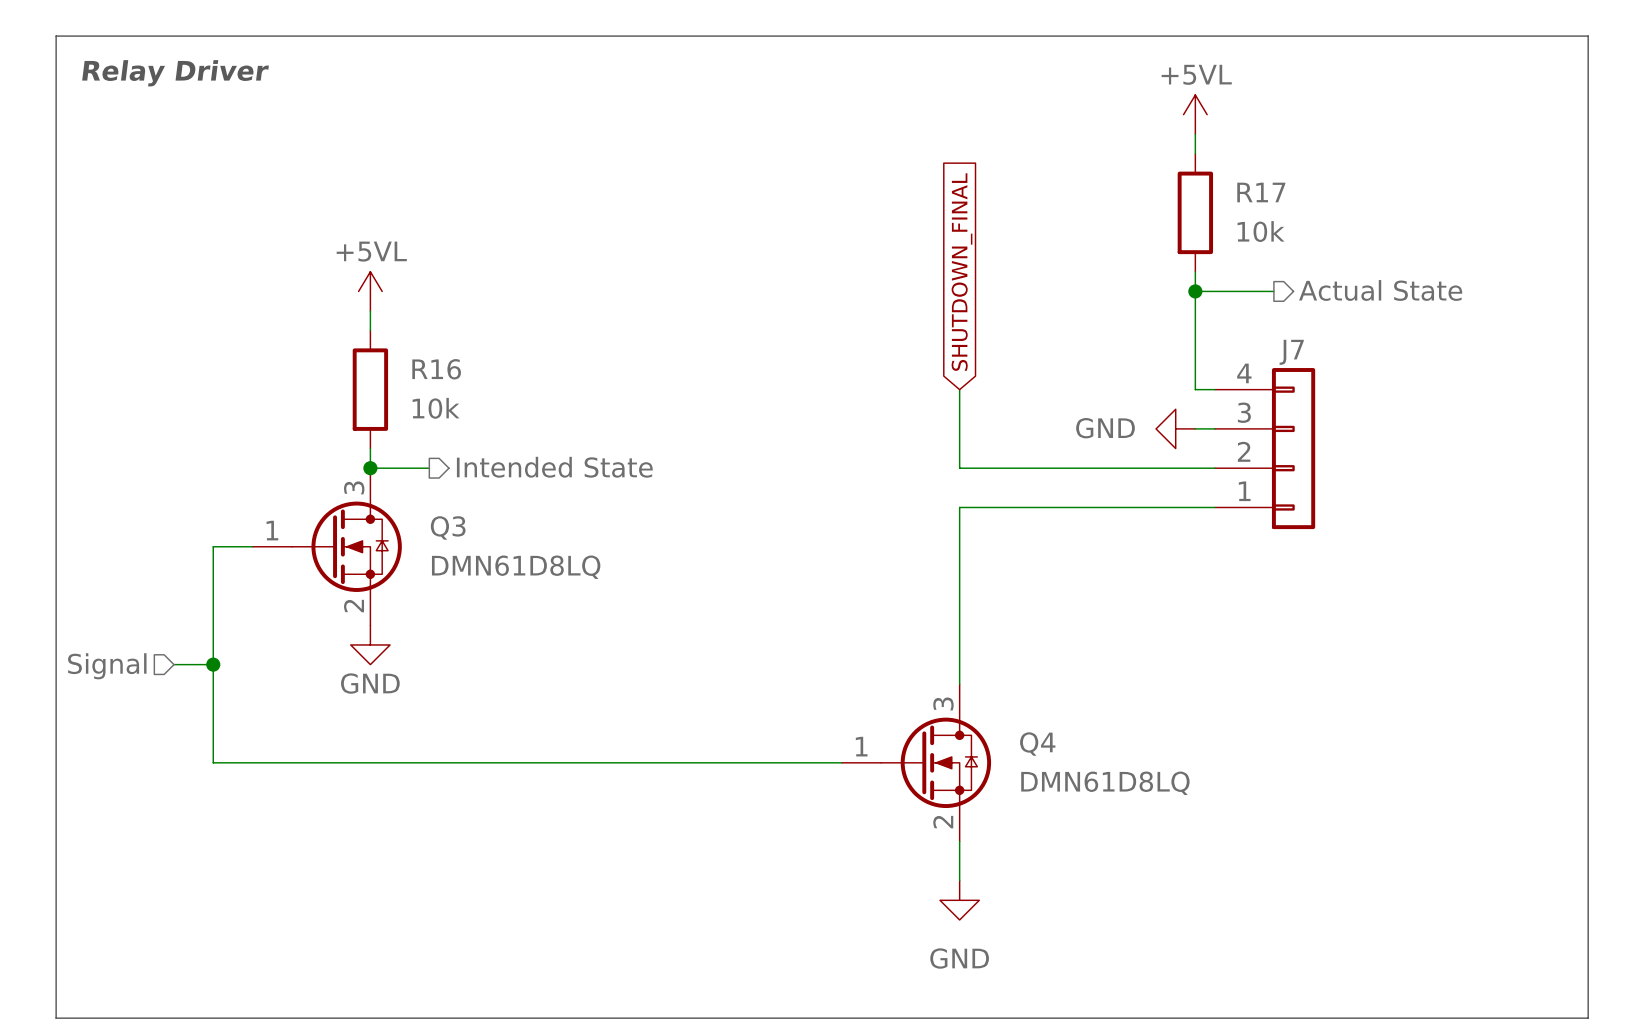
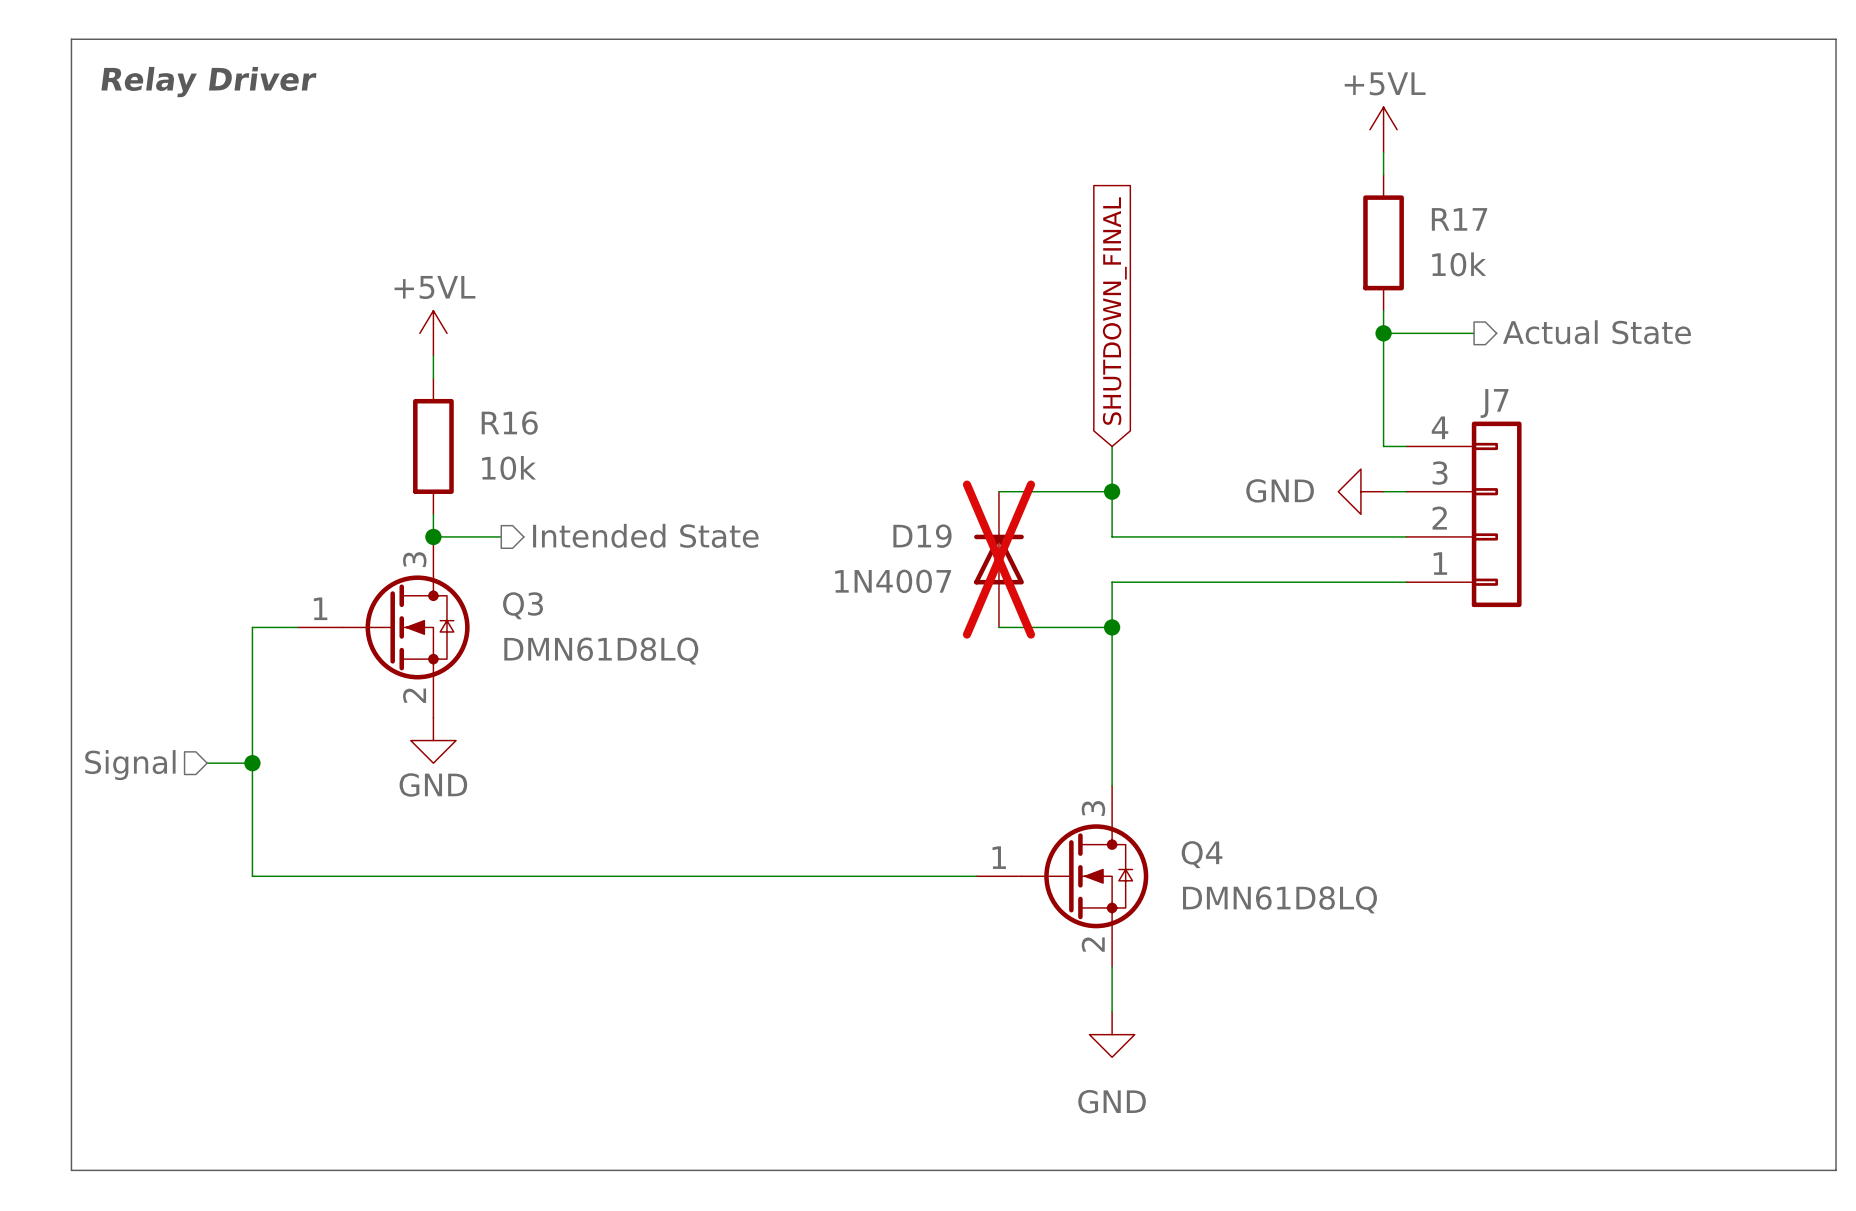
wire: none -> (998, 491) (1112, 491)
junction: none -> (1112, 491)
D19: none -> 1N4007 (998, 559)
wire: none -> (998, 627) (1112, 627)
junction: none -> (1112, 627)

